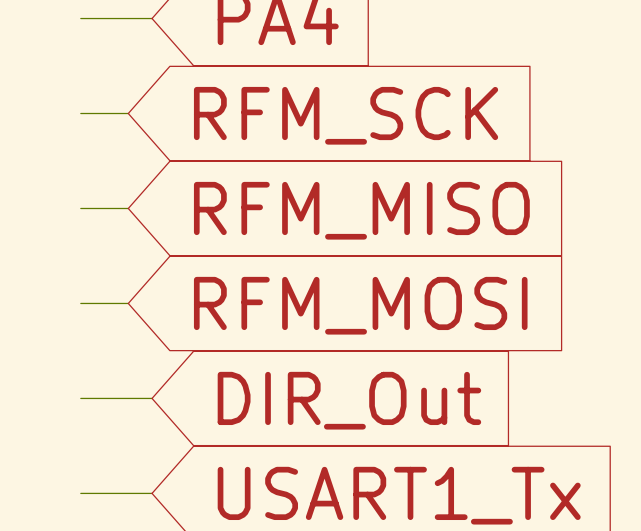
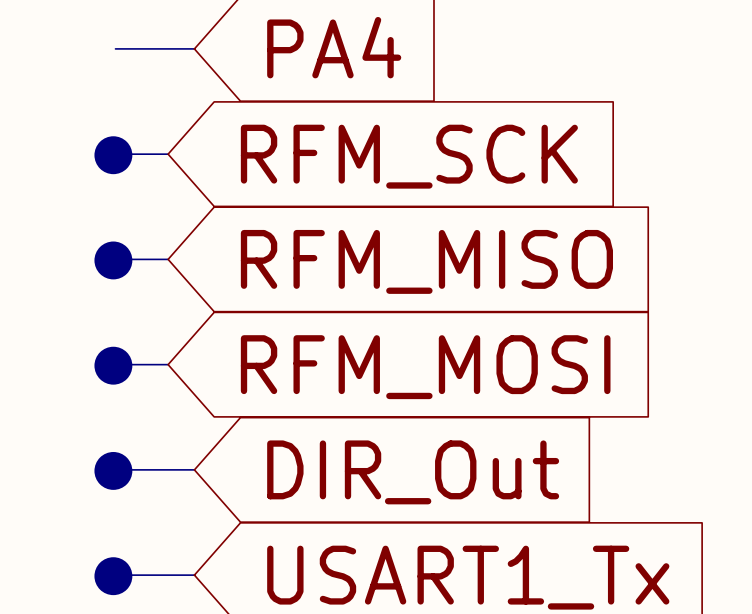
junction: none -> (113, 155)
junction: none -> (113, 260)
junction: none -> (113, 365)
junction: none -> (113, 470)
junction: none -> (113, 576)

